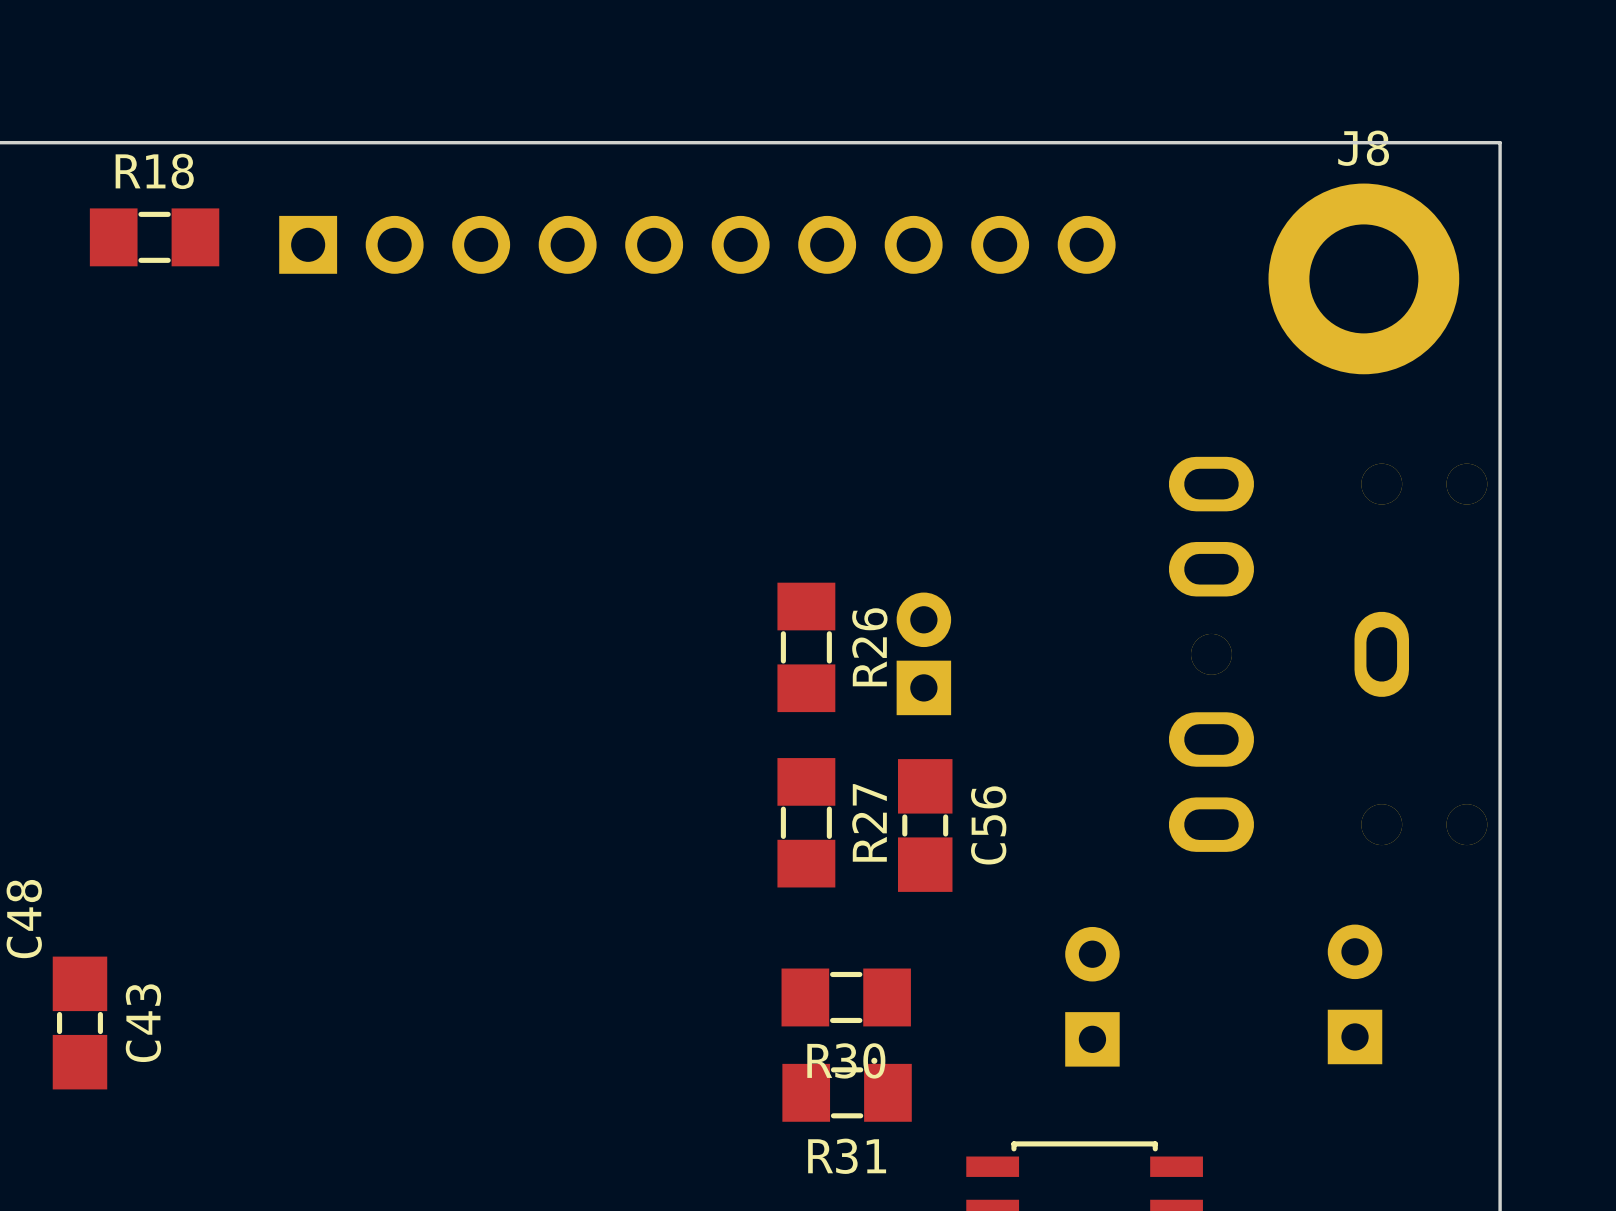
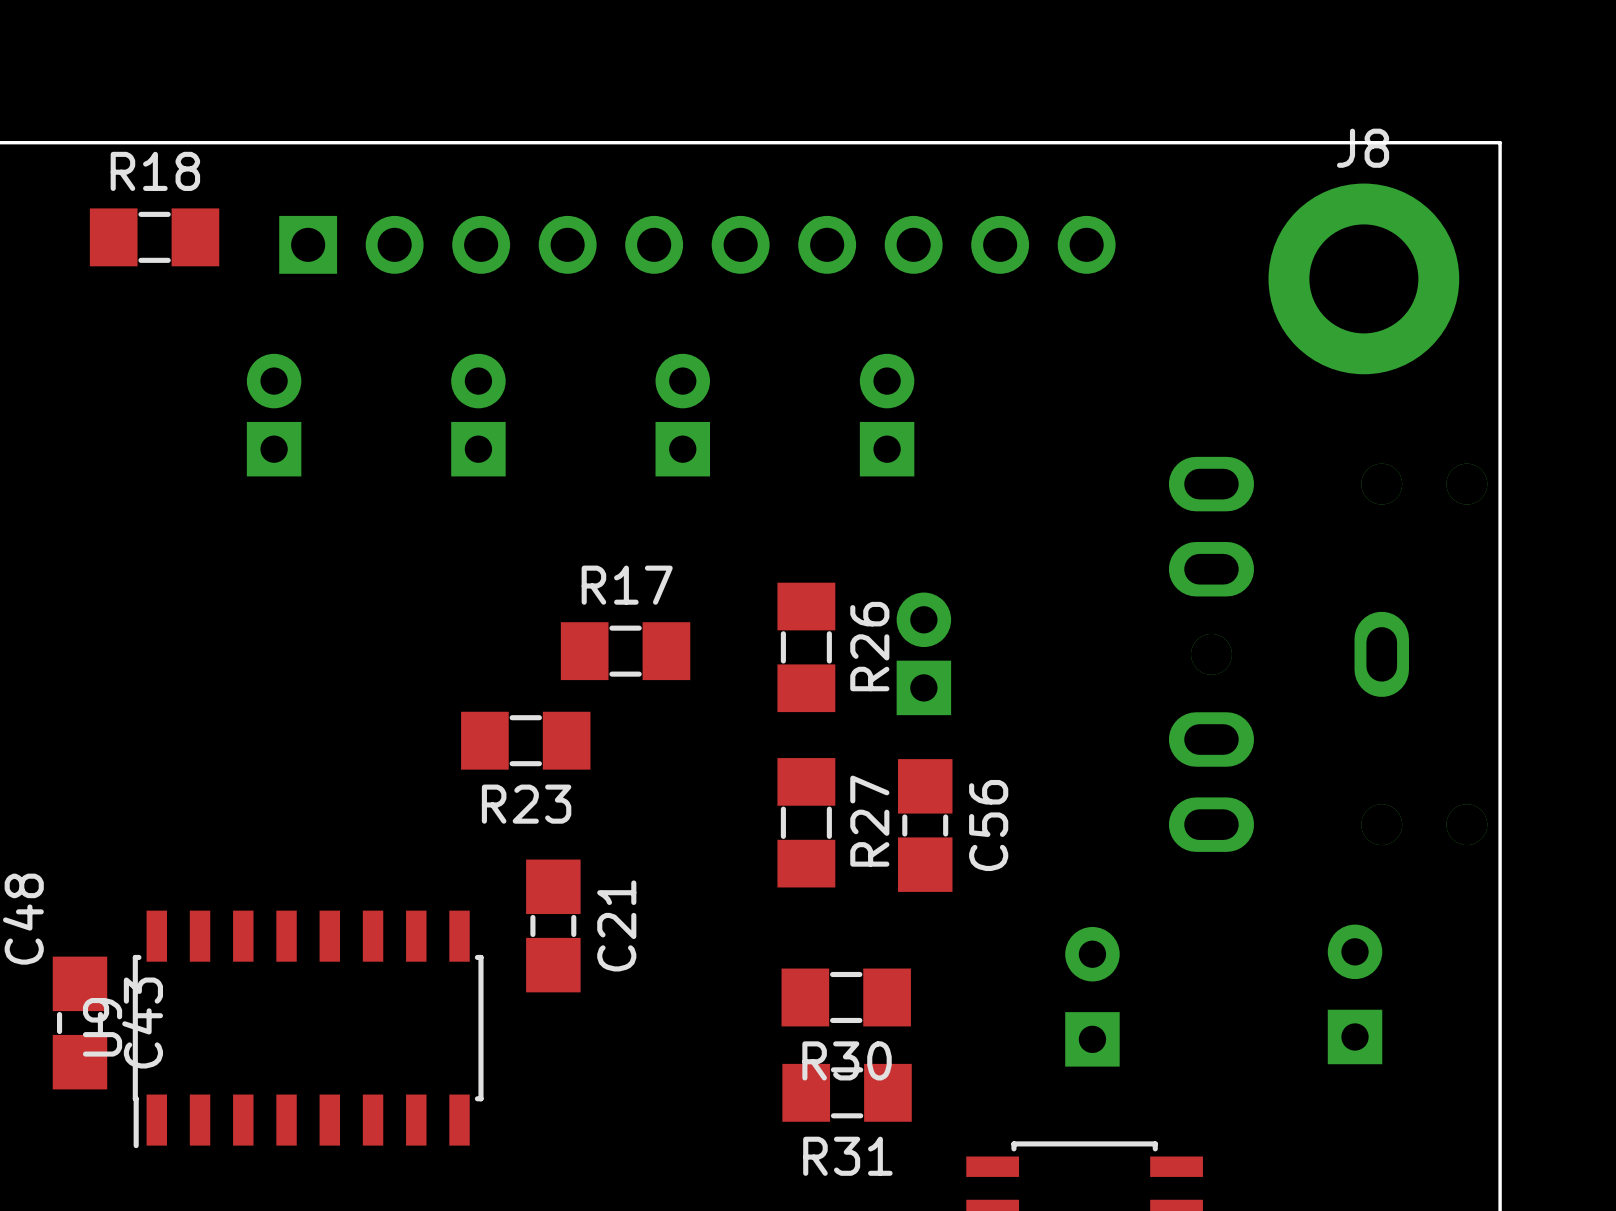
part: none -> (274, 415)
part: none -> (478, 415)
part: none -> (682, 415)
part: none -> (887, 415)
R17: none -> (625, 651)
R23: none -> (525, 740)
C21: none -> (553, 925)
U9: none -> (308, 1029)

